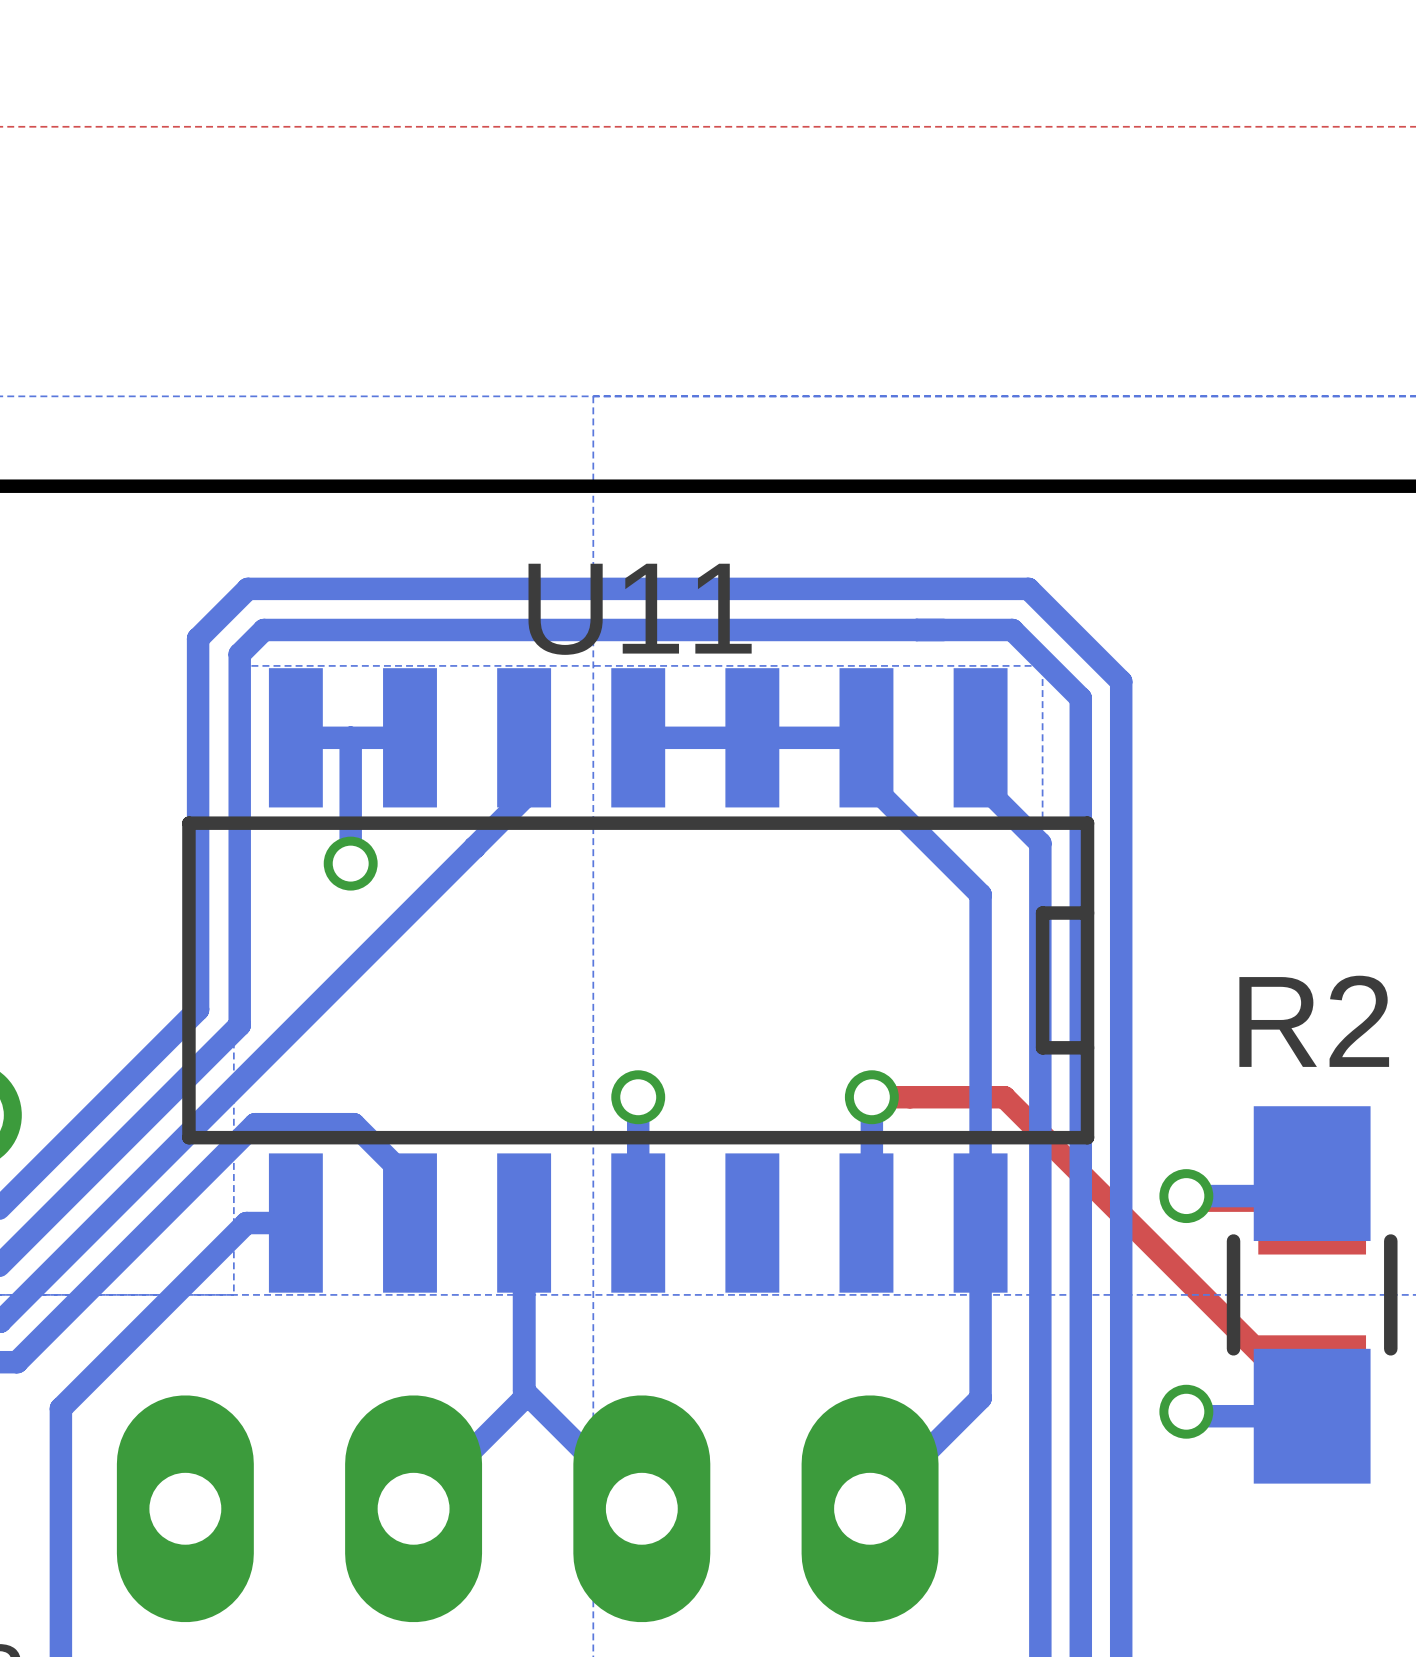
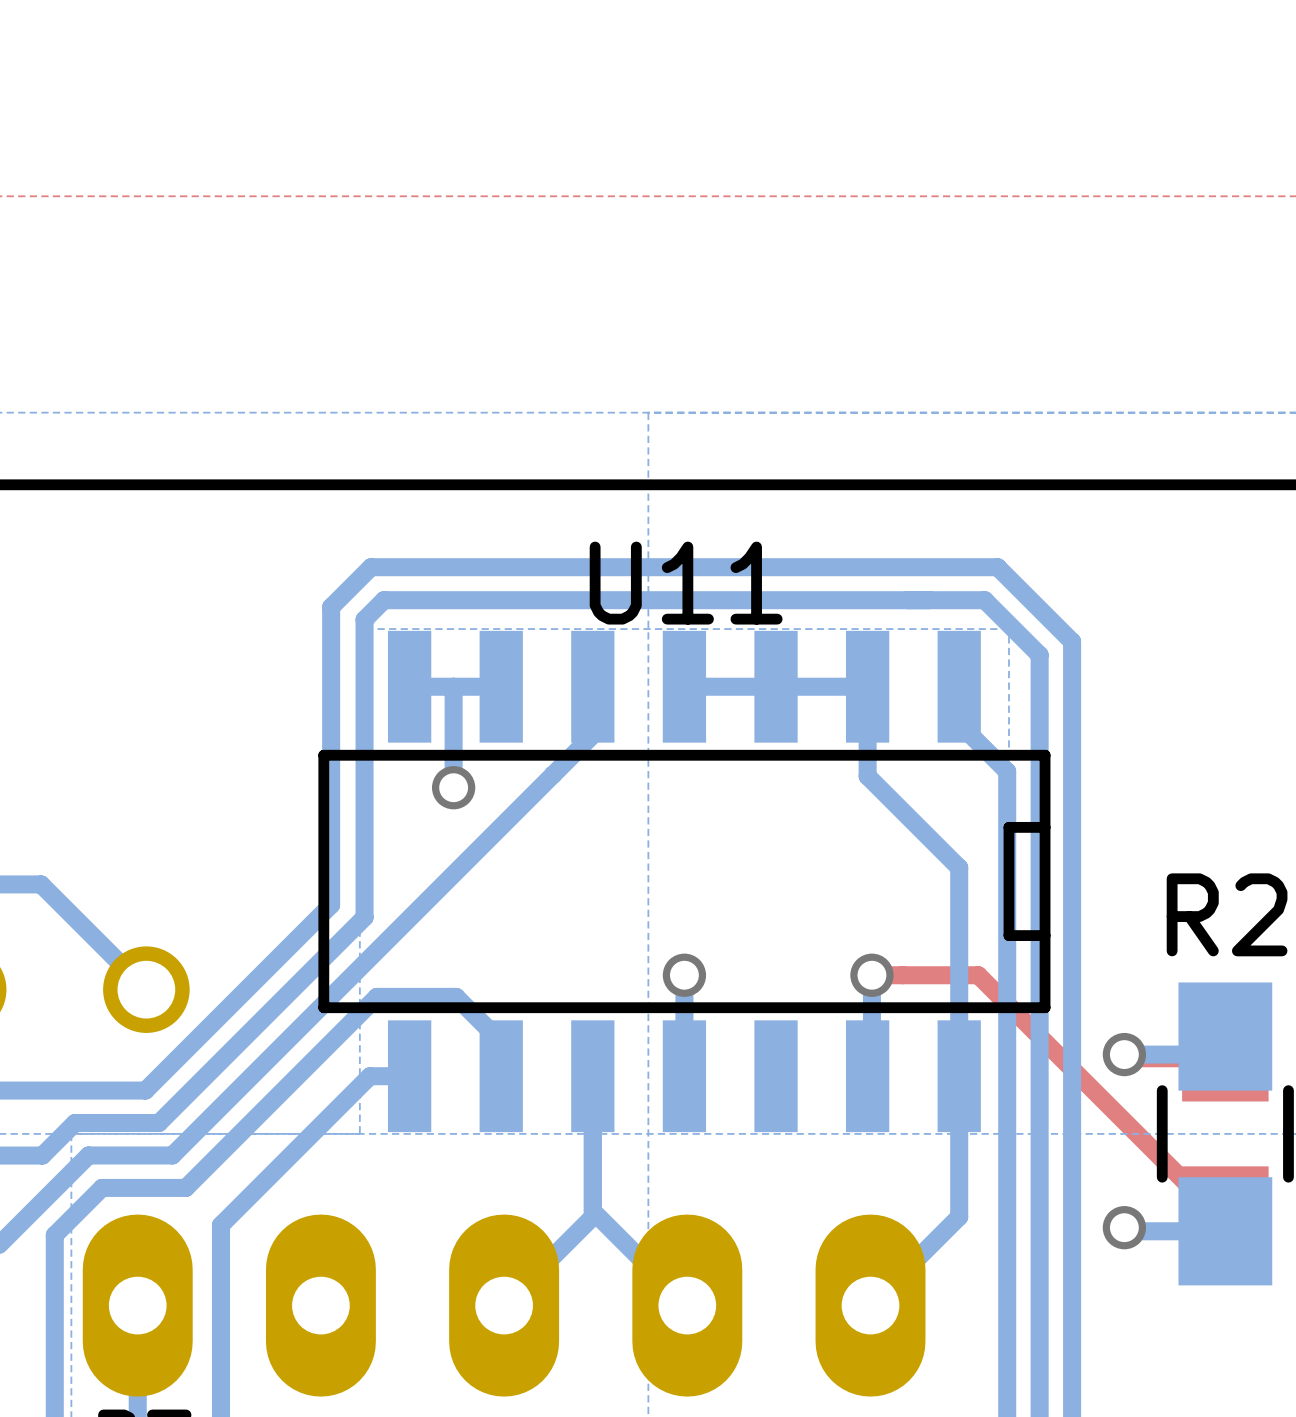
bottom track: (866, 780) (980, 894) (980, 963) -> (867, 721) (867, 776) (959, 867)

